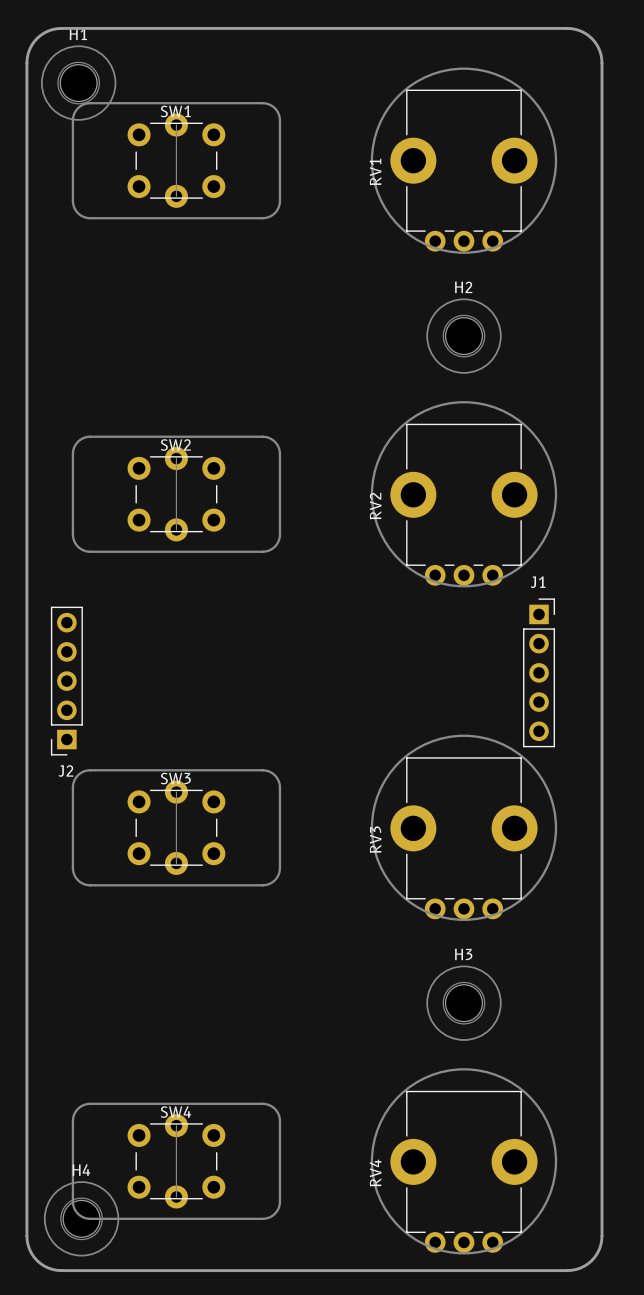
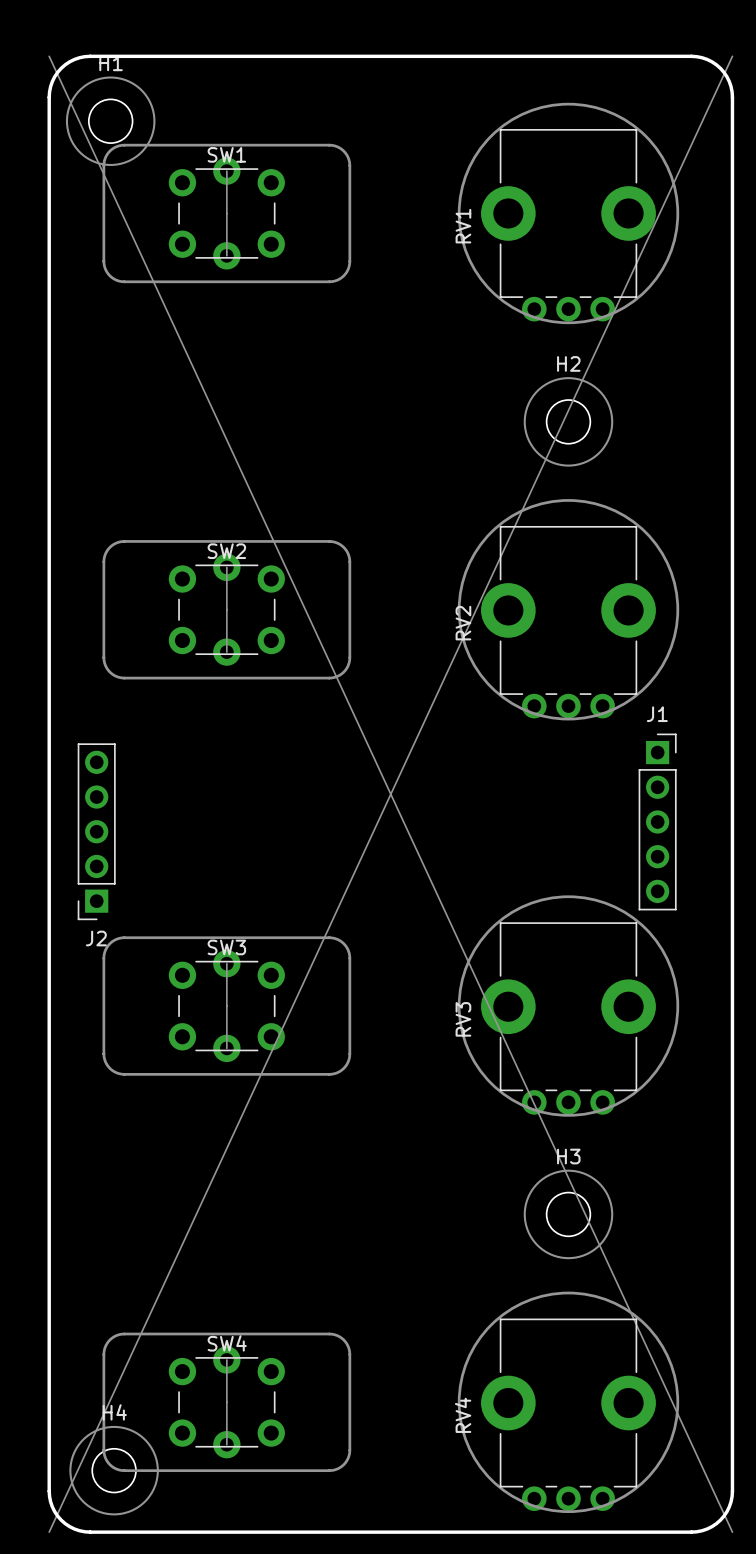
line: none -> (49, 56) (732, 1532)
line: none -> (732, 56) (49, 1532)
drawing: [57, 61, 100, 105] -> none
drawing: [442, 314, 486, 358] -> none
drawing: [442, 981, 486, 1025] -> none
drawing: [60, 1197, 103, 1241] -> none

